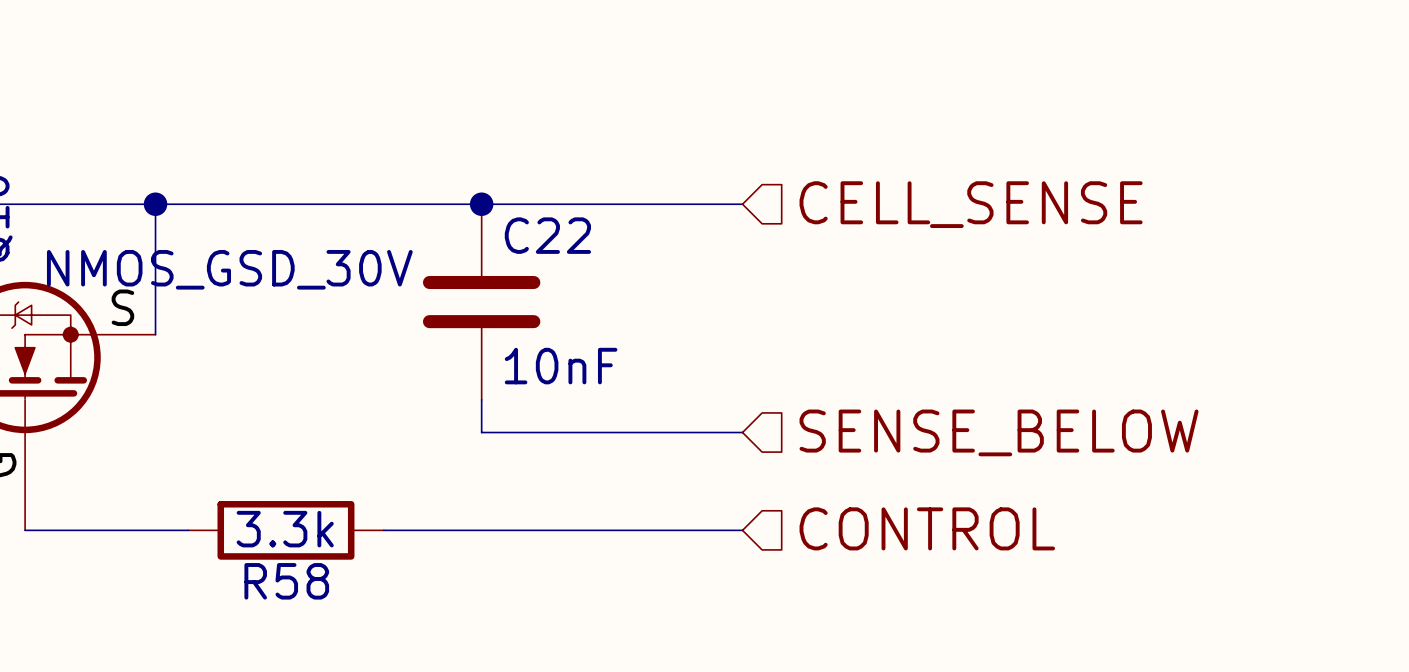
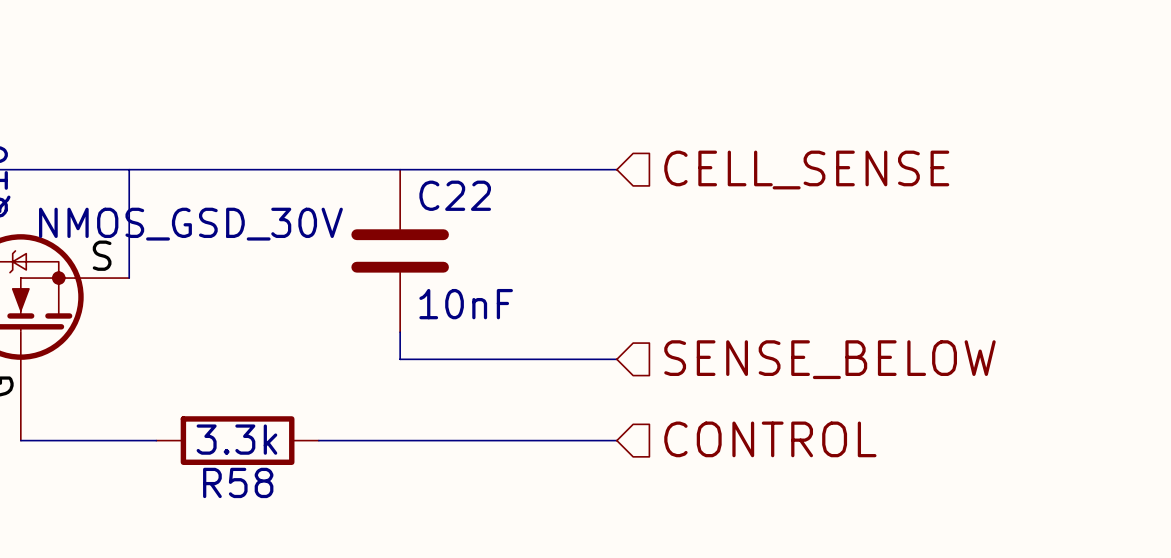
junction: (155, 204) -> none
junction: (481, 204) -> none

